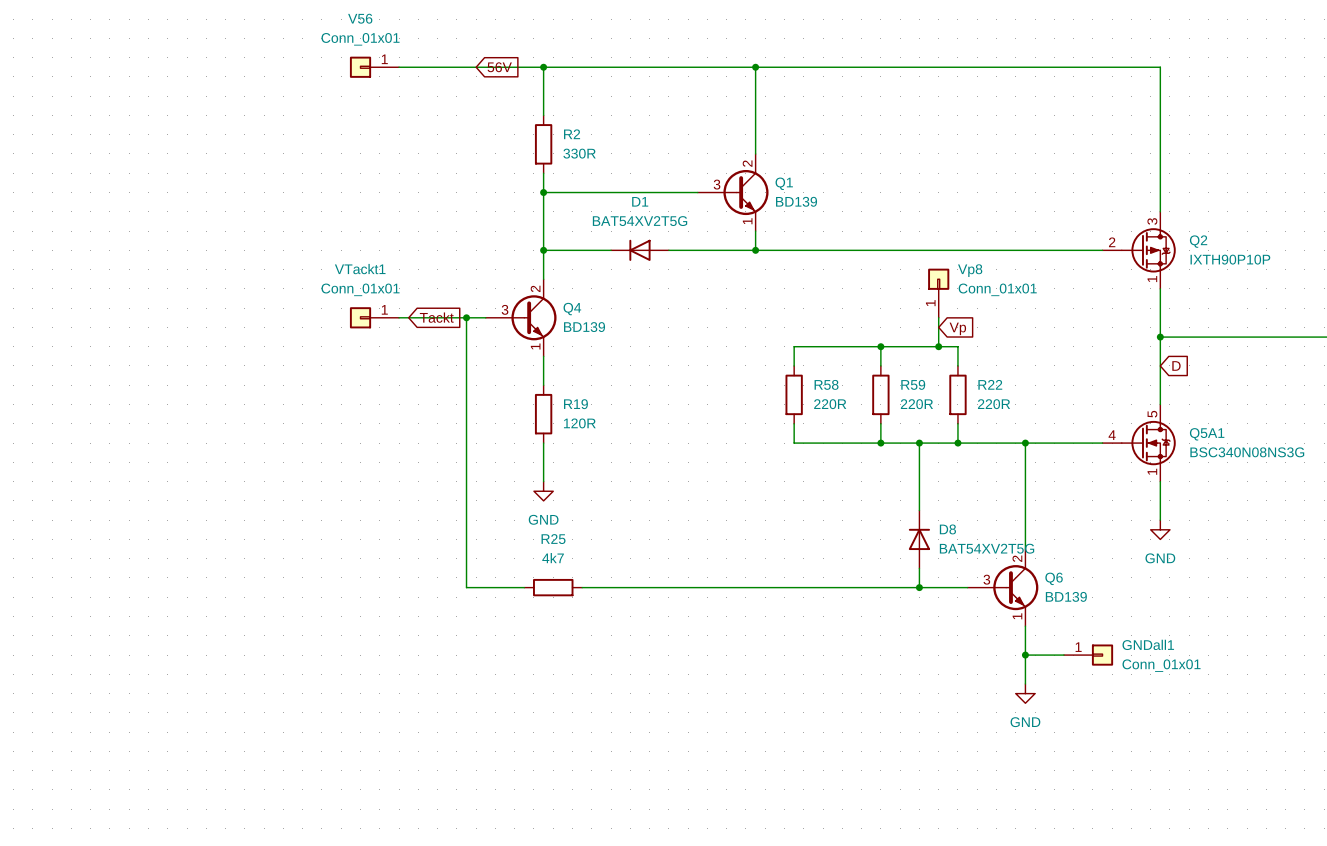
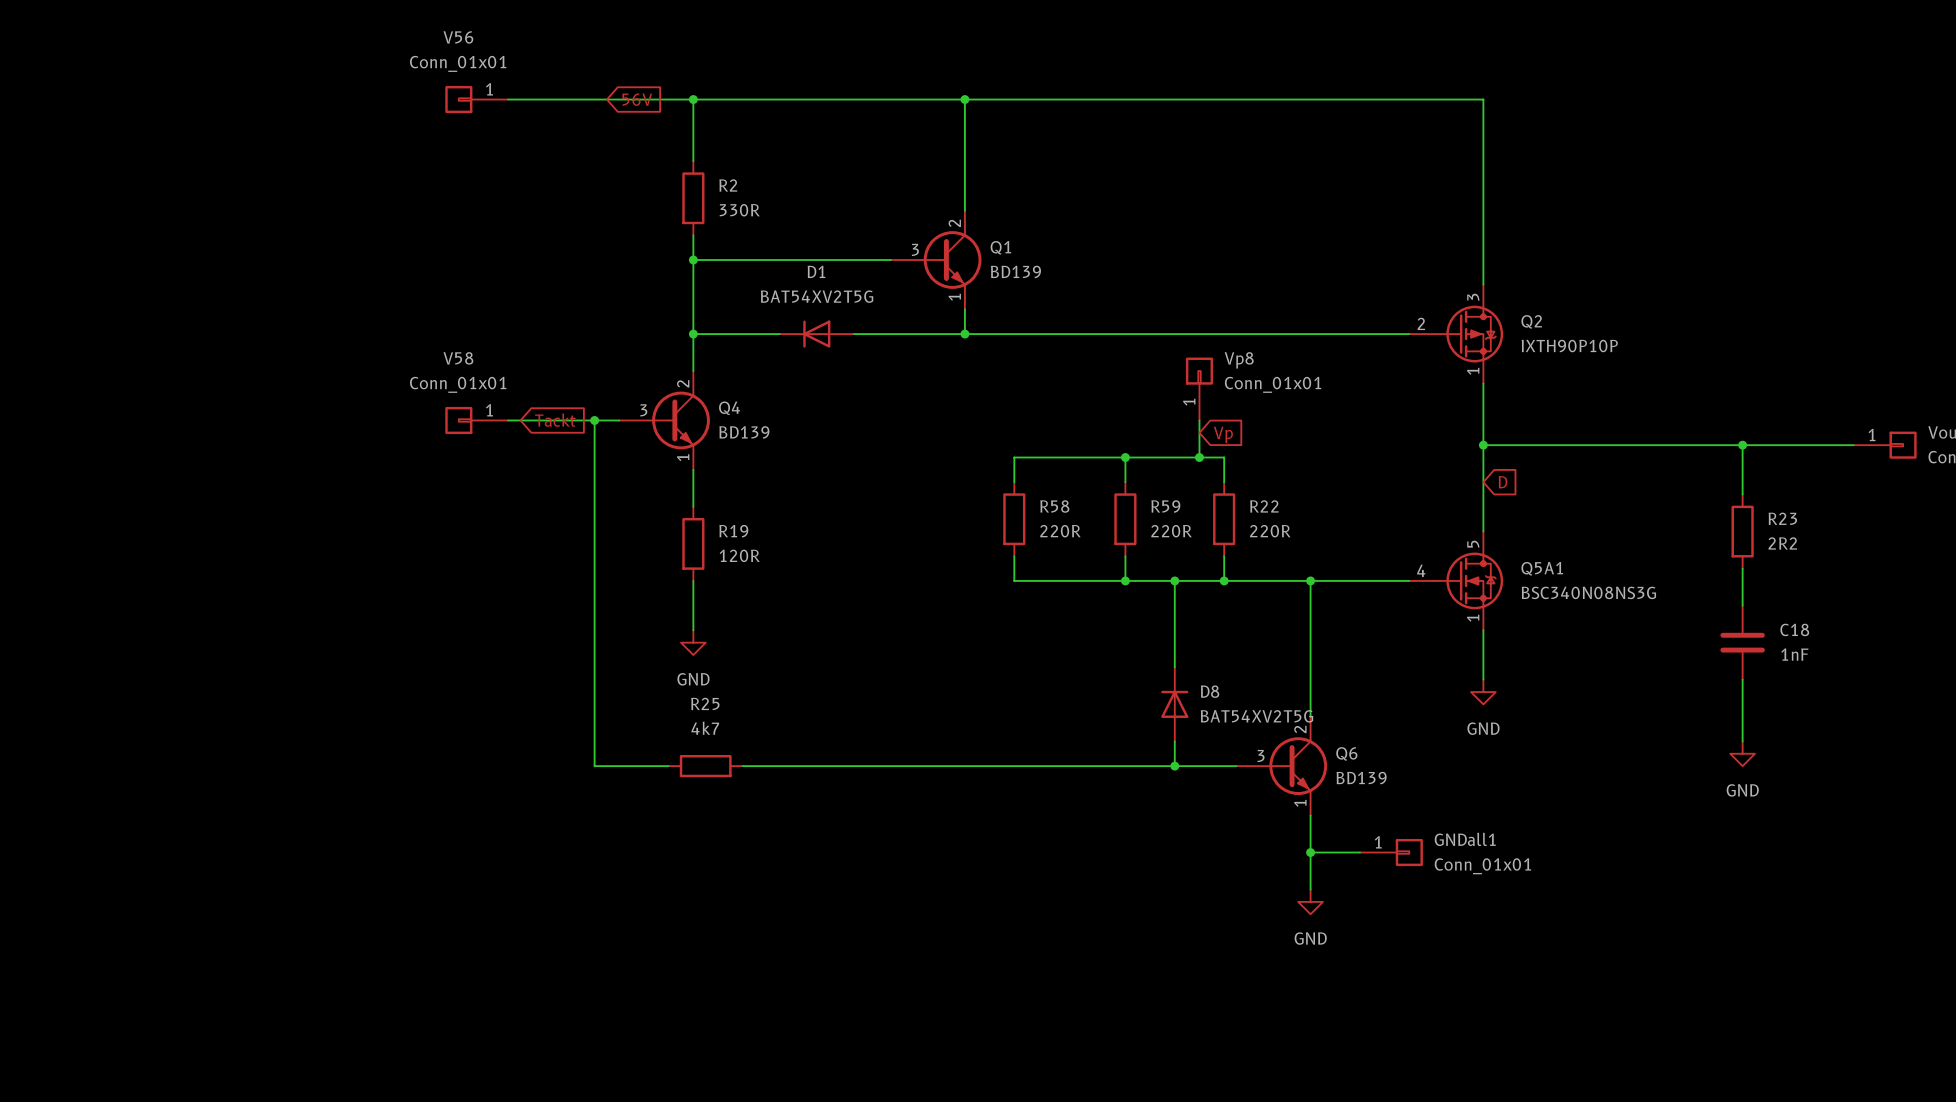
VTackt1 name: VTackt1 (360, 269) -> V58 (458, 358)

